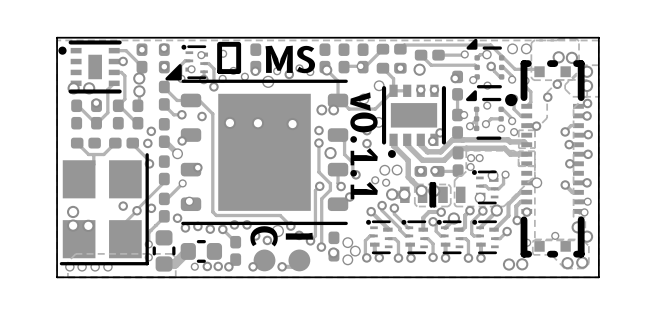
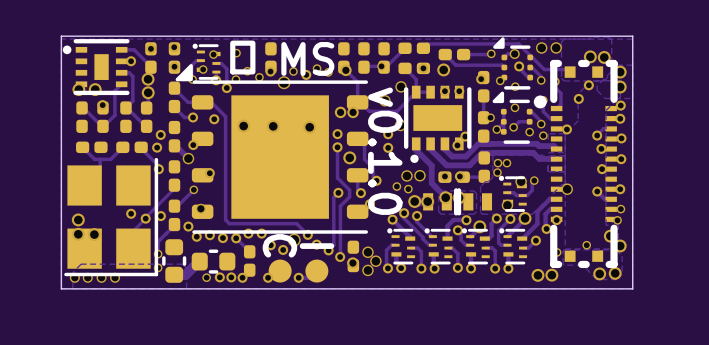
text: v0.1.1 (364, 145) -> v0.1.0 (385, 151)

